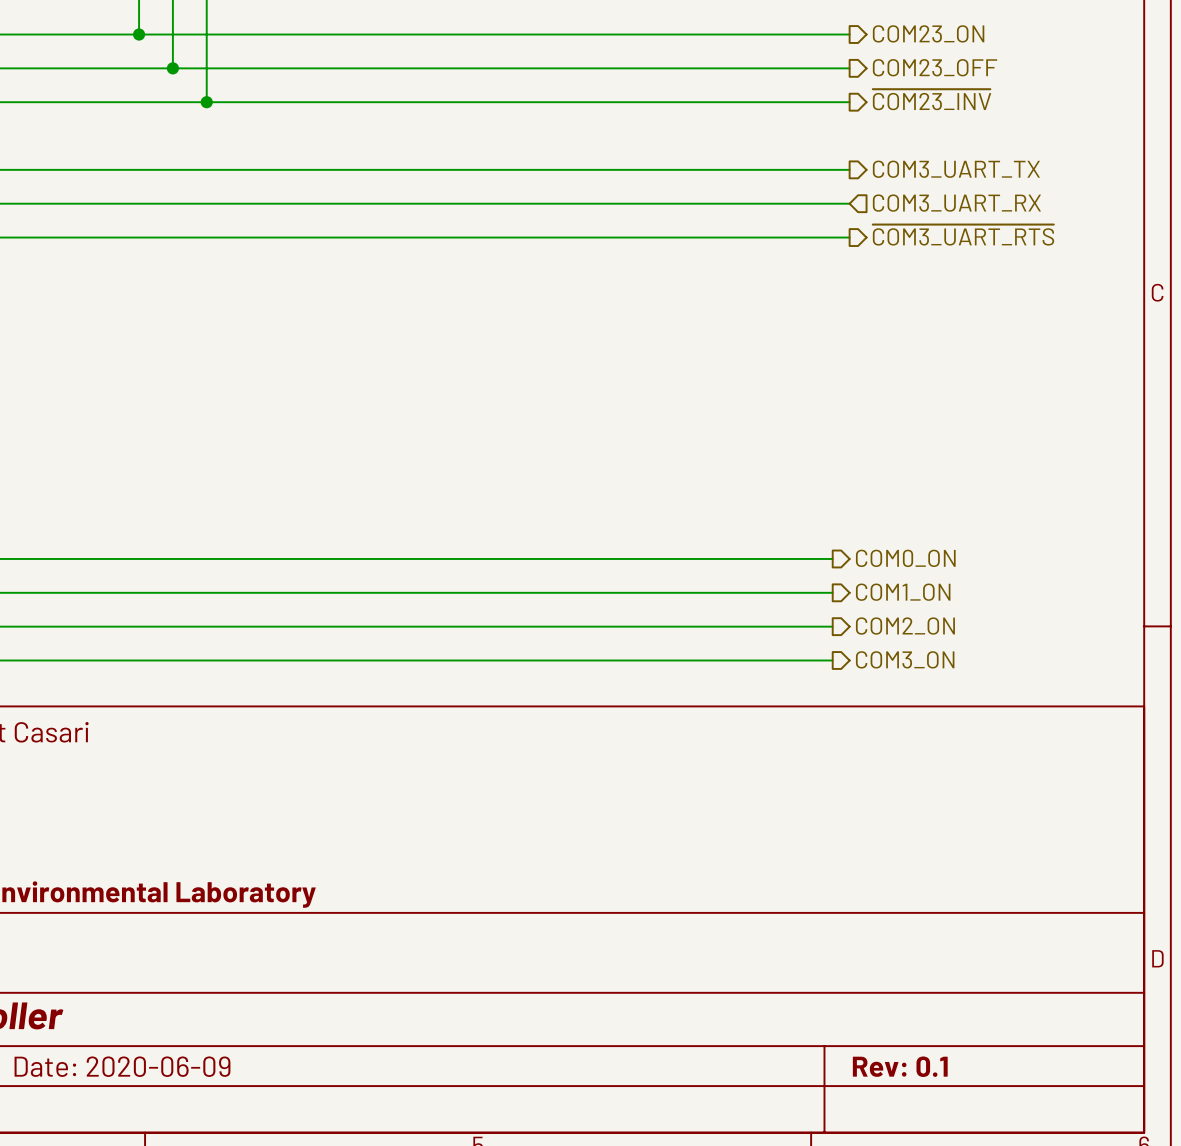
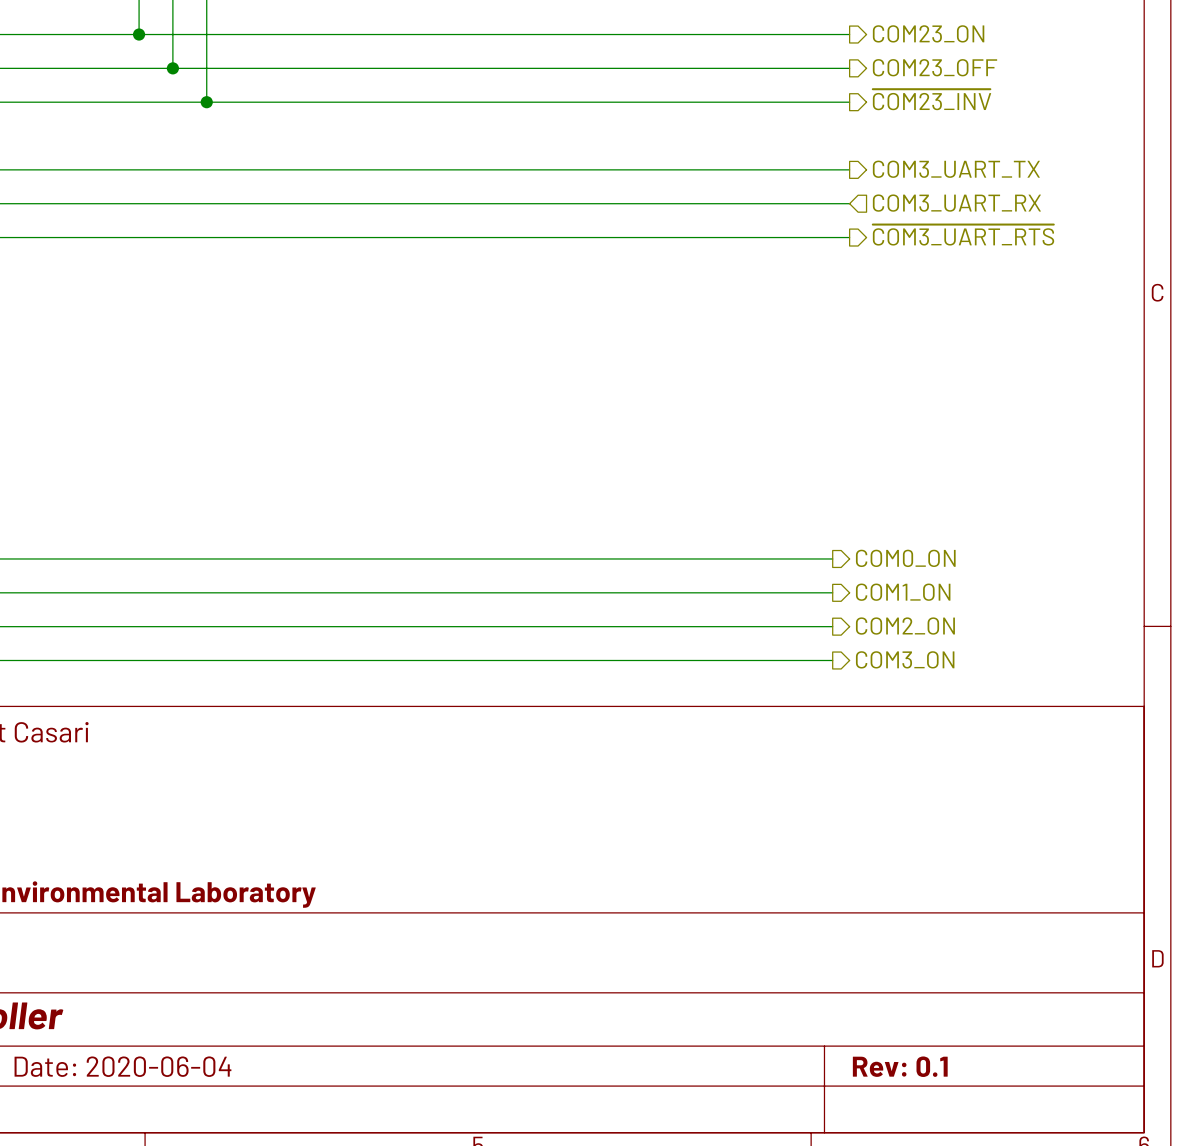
title block: Date: 2020-06-09 (122, 1066) -> Date: 2020-06-04 (122, 1066)

